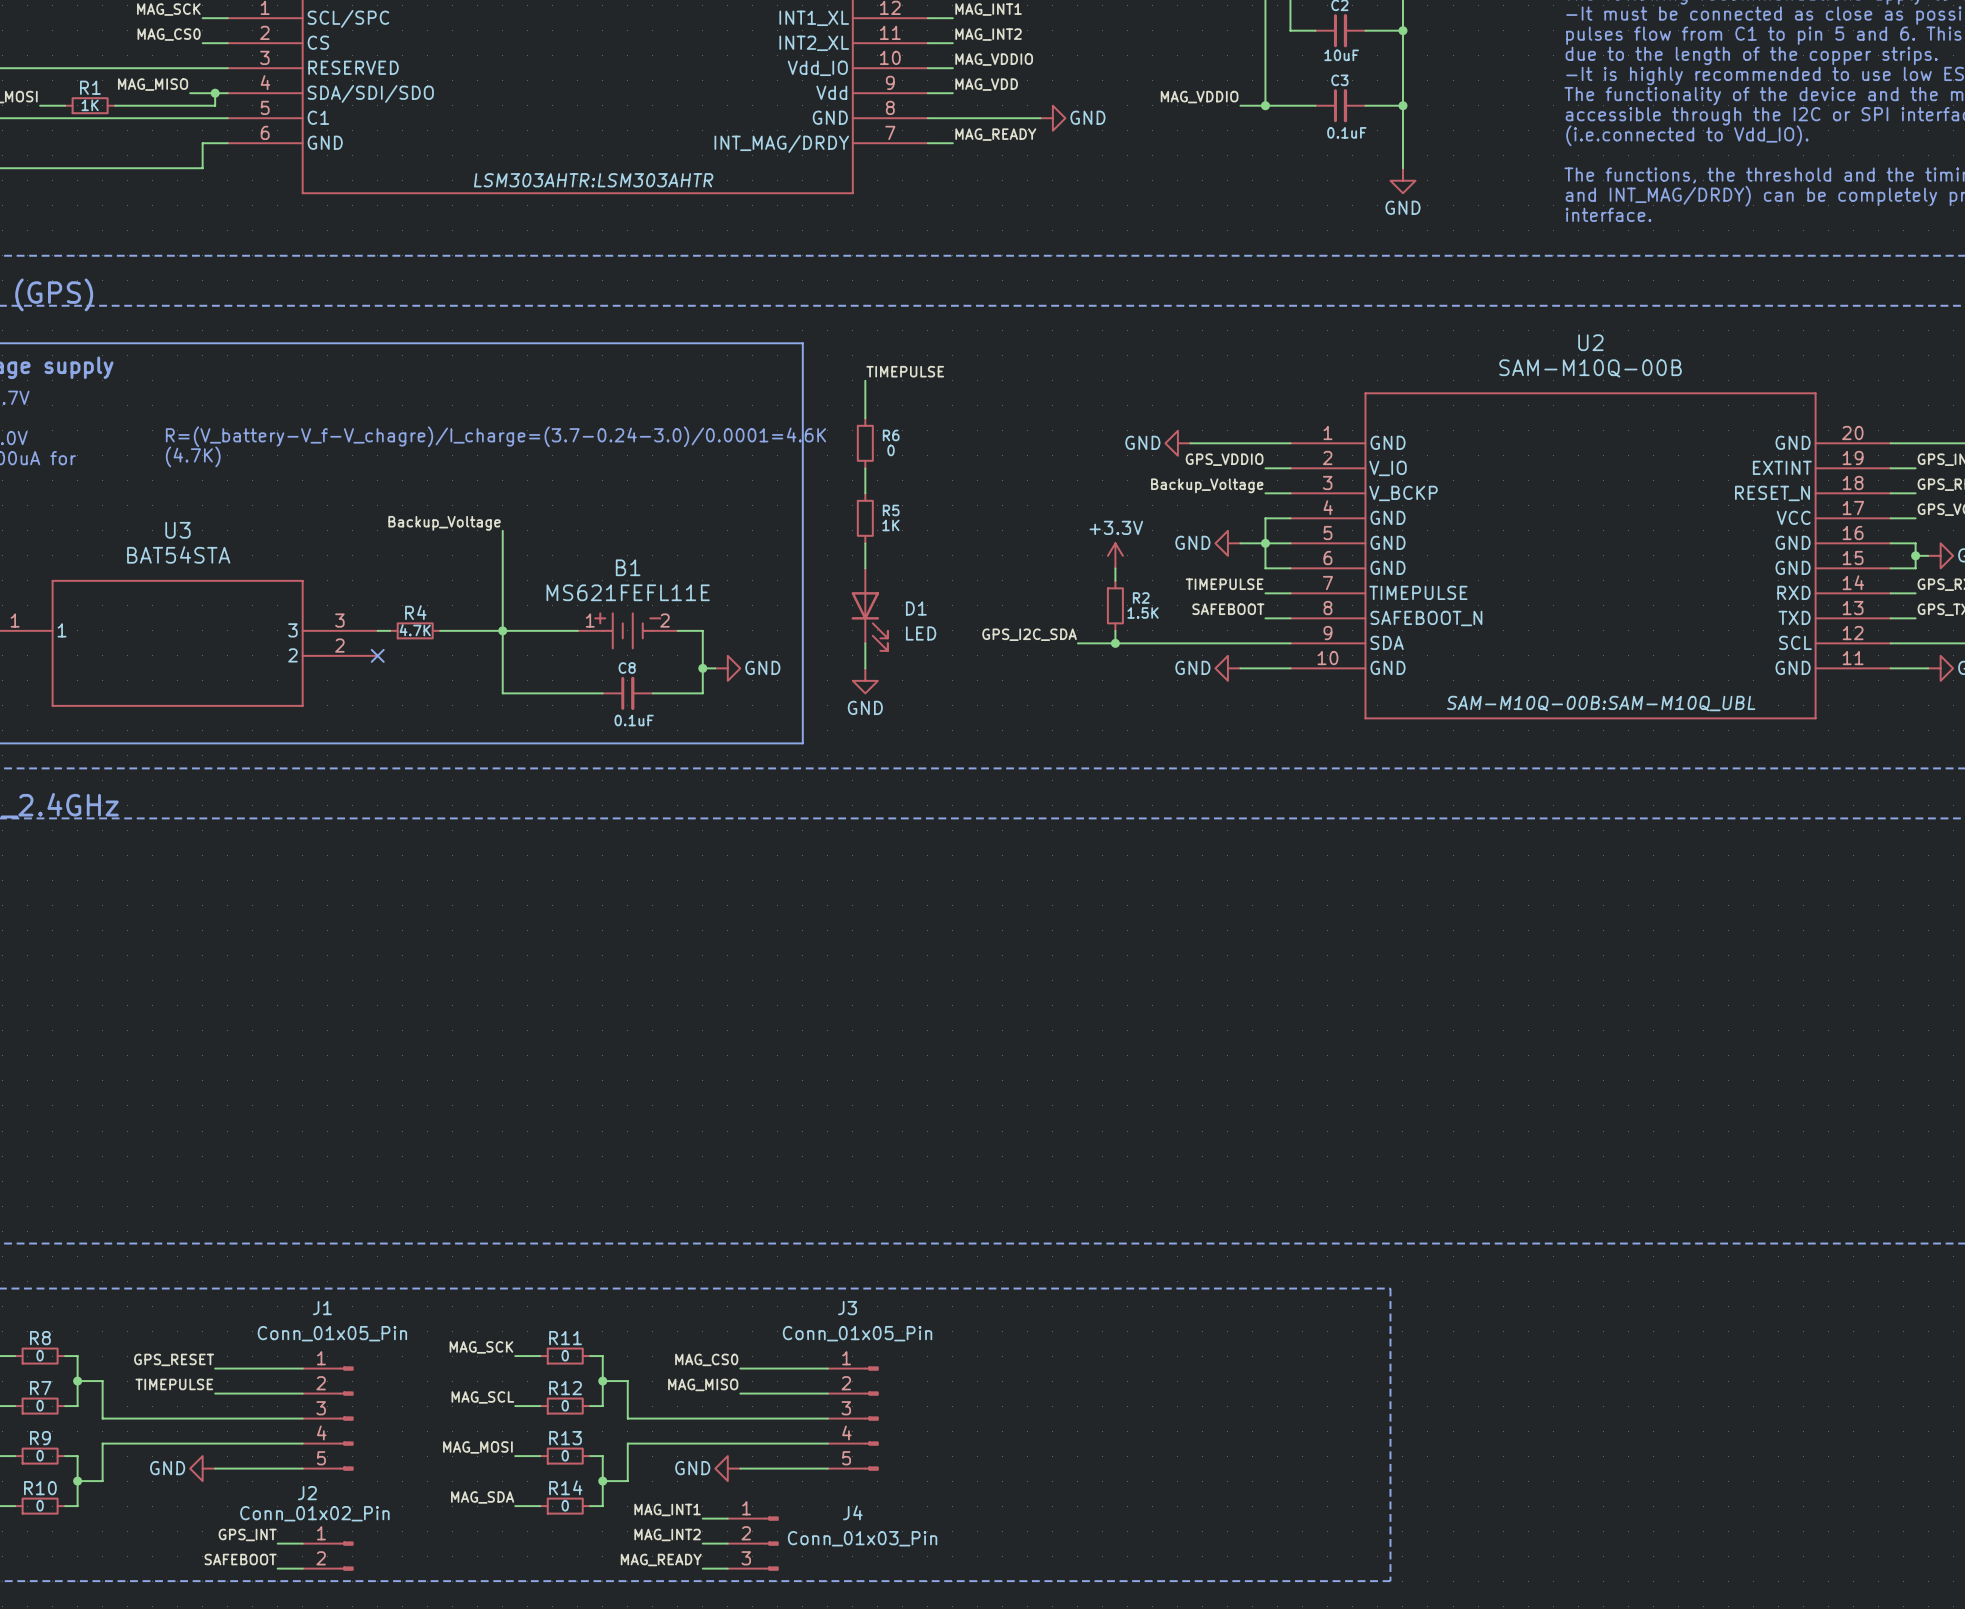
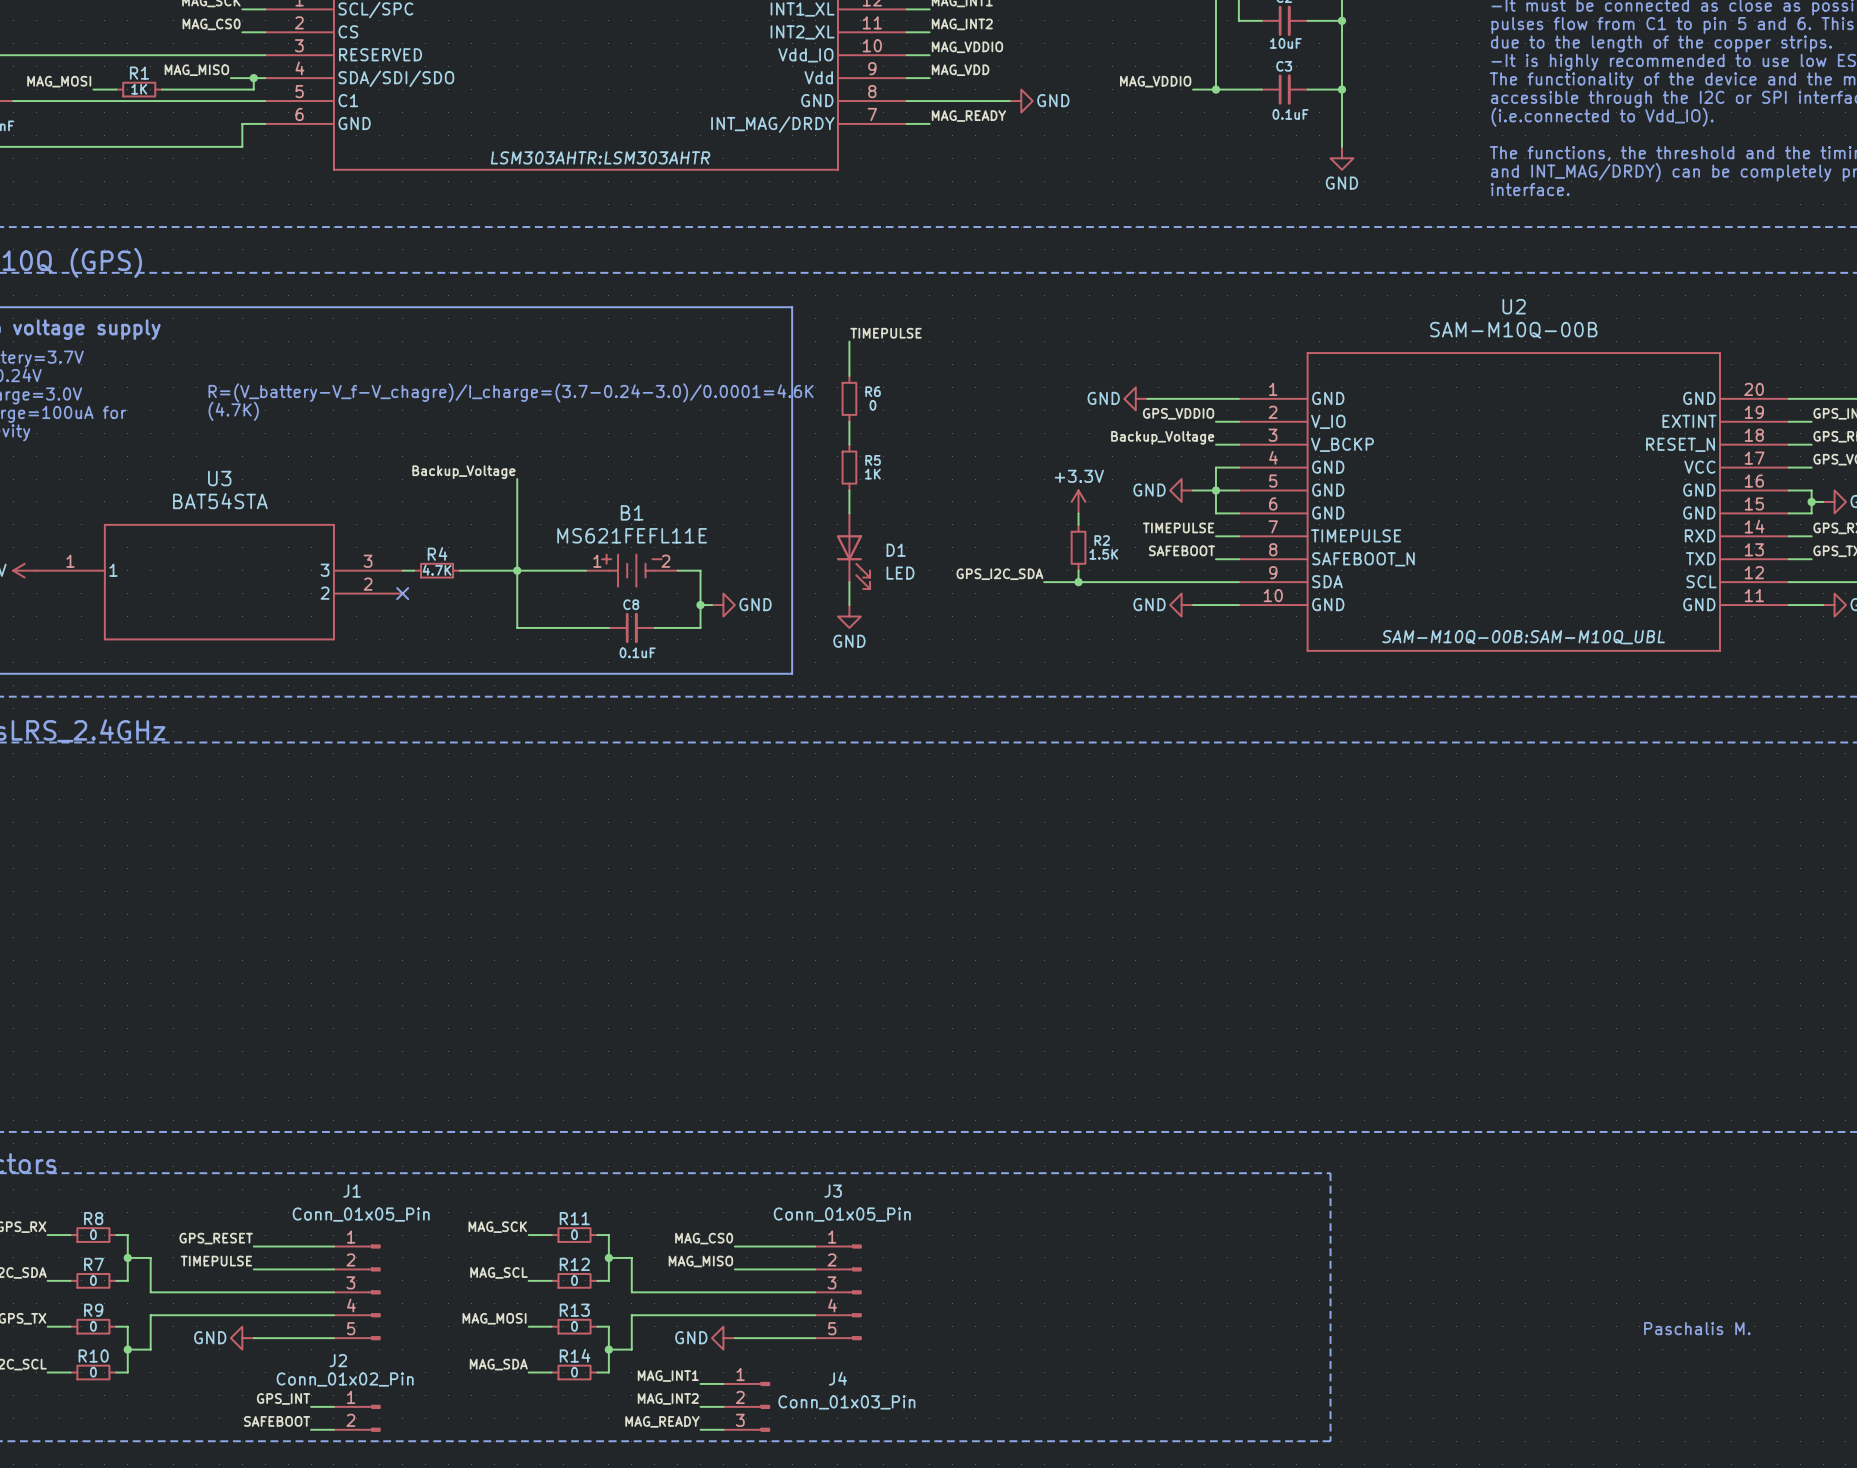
text: none -> Paschalis M. (1697, 1328)

